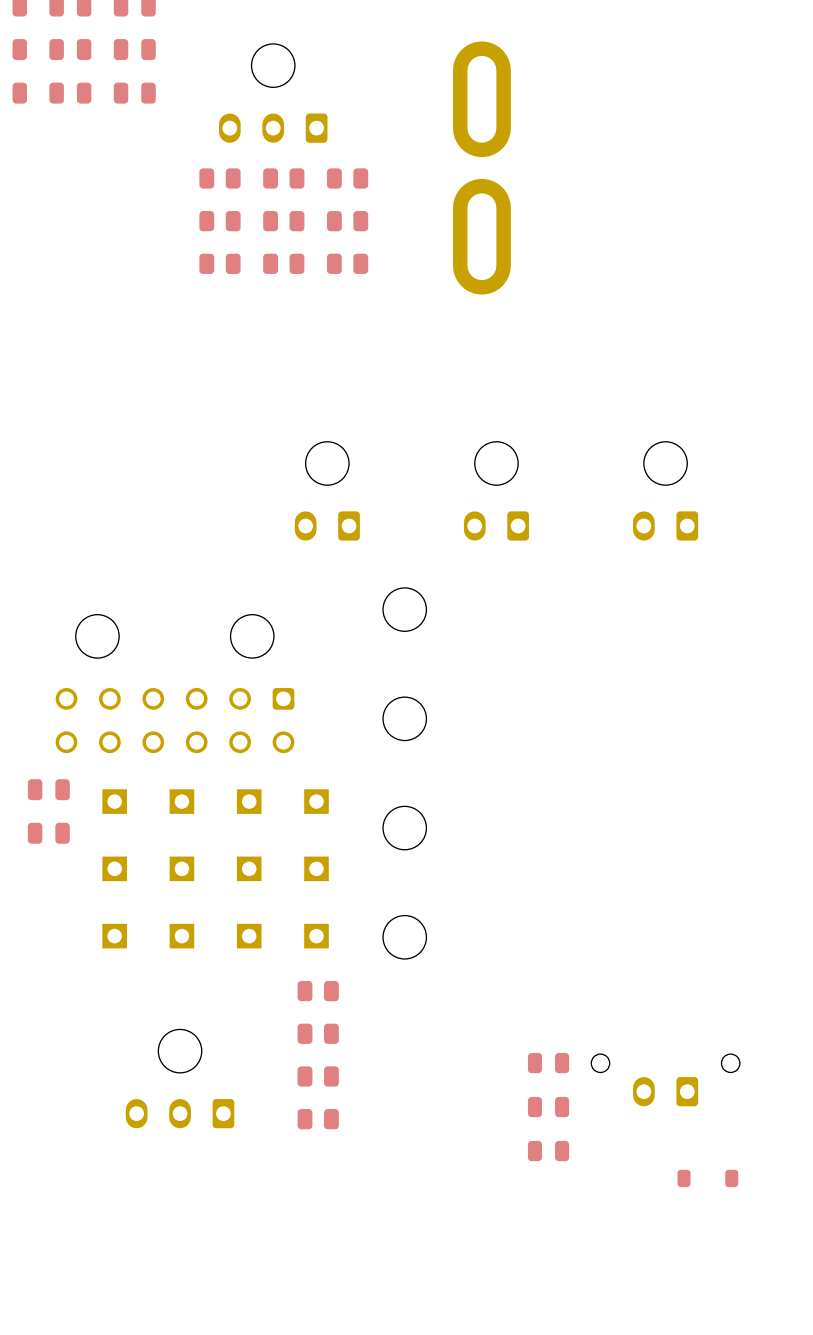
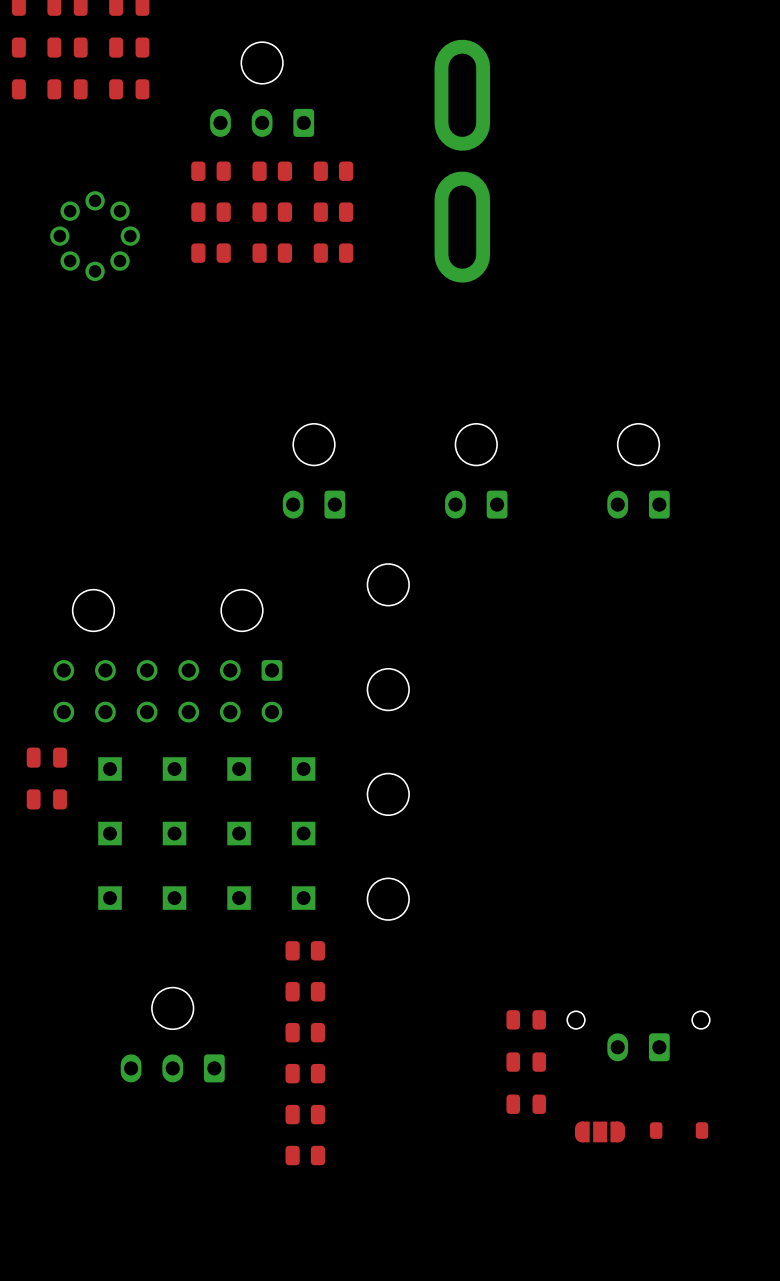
part: none -> (95, 236)
part: none -> (305, 1114)
part: none -> (600, 1131)
part: none -> (305, 1155)

